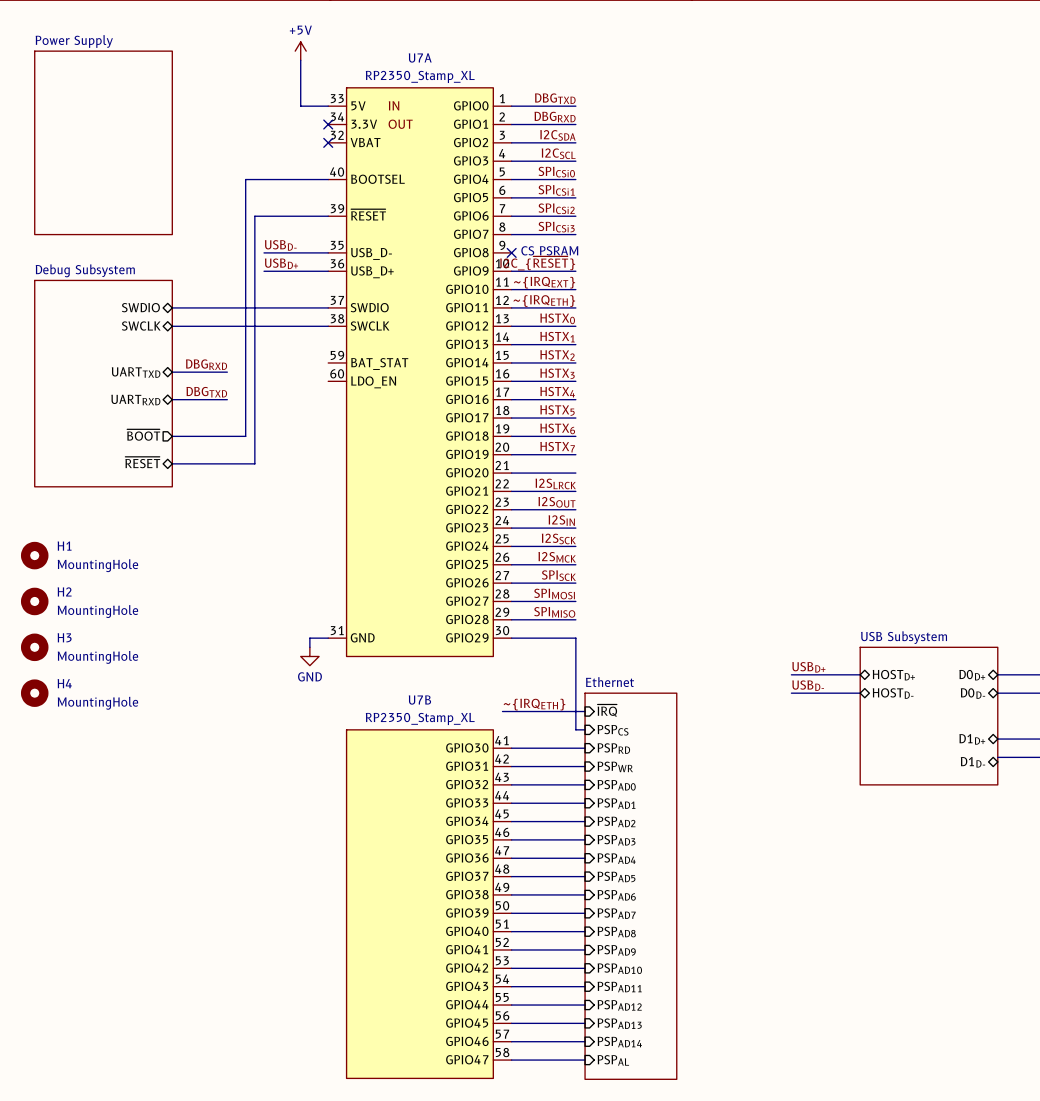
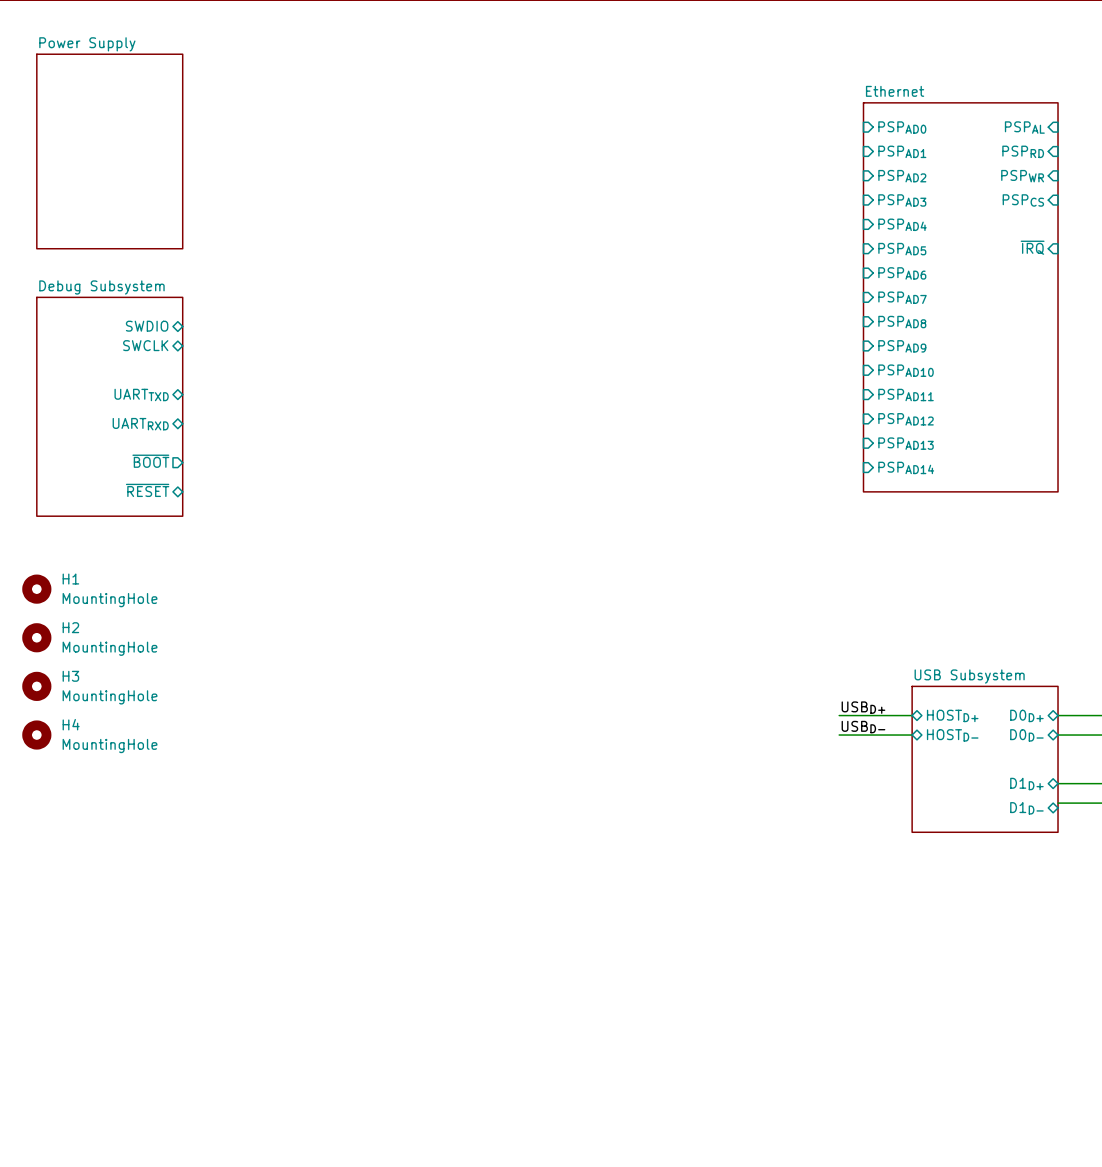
power symbol: +5V (300, 51) -> none
wire: (300, 60) (300, 106) (328, 106) -> none
label: DBGTXD (555, 98) -> none
wire: (511, 106) (575, 106) -> none
label: DBGRXD (555, 117) -> none
sheet pin: none -> PSPAD0 (902, 127)
sheet pin: none -> PSPAL (1024, 127)
no-connect mark: (328, 124) -> none
wire: (511, 124) (575, 124) -> none
label: I2CSDA (557, 135) -> none
no-connect mark: (328, 142) -> none
wire: (511, 142) (575, 142) -> none
sheet pin: none -> PSPAD1 (902, 151)
sheet pin: none -> PSPRD (1023, 151)
label: I2CSCL (558, 153) -> none
wire: (511, 161) (575, 161) -> none
sheet pin: none -> PSPAD2 (902, 176)
sheet pin: none -> PSPWR (1022, 176)
label: SPICSi0 (556, 172) -> none
wire: (328, 179) (245, 179) (245, 436) (172, 436) -> none
wire: (511, 179) (575, 179) -> none
sheet pin: none -> PSPAD3 (902, 200)
sheet pin: none -> PSPCS (1023, 200)
label: SPICSi1 (556, 190) -> none
wire: (511, 197) (575, 197) -> none
label: SPICSi2 (556, 208) -> none
sheet pin: none -> PSPAD4 (902, 224)
wire: (328, 216) (254, 216) (254, 463) (172, 463) -> none
wire: (511, 216) (575, 216) -> none
label: SPICSi3 (556, 227) -> none
sheet pin: none -> ~{IRQ} (1032, 247)
wire: (511, 234) (575, 234) -> none
sheet pin: none -> PSPAD5 (902, 249)
label: USBD- (280, 245) -> none
text: CS PSRAM (549, 250) -> none
wire: (264, 252) (328, 252) -> none
no-connect mark: (511, 252) -> none
sheet pin: none -> PSPAD6 (902, 273)
label: USBD+ (281, 263) -> none
label: I2C_{~{RESET}} (537, 263) -> none
wire: (264, 271) (328, 271) -> none
wire: (511, 271) (575, 271) -> none
sheet pin: none -> PSPAD7 (902, 297)
sheet Ethernet: none -> (960, 297)
label: ~{IRQEXT} (544, 282) -> none
wire: (511, 289) (575, 289) -> none
label: ~{IRQETH} (544, 301) -> none
sheet pin: none -> PSPAD8 (902, 322)
wire: (172, 307) (328, 307) -> none
wire: (511, 307) (575, 307) -> none
label: HSTX0 (557, 318) -> none
wire: (172, 326) (328, 326) -> none
wire: (511, 326) (575, 326) -> none
sheet pin: none -> PSPAD9 (902, 346)
label: HSTX1 (557, 337) -> none
wire: (511, 344) (575, 344) -> none
sheet pin: none -> PSPAD10 (906, 370)
label: HSTX2 (557, 355) -> none
wire: (511, 362) (575, 362) -> none
label: DBGRXD (206, 364) -> none
wire: (172, 372) (227, 372) -> none
U7A: RP2350_Stamp_XL (419, 372) -> none
sheet pin: none -> PSPAD11 (906, 394)
label: HSTX3 (557, 373) -> none
wire: (511, 381) (575, 381) -> none
label: DBGTXD (206, 392) -> none
label: HSTX4 (557, 392) -> none
sheet pin: none -> PSPAD12 (906, 419)
wire: (172, 399) (227, 399) -> none
wire: (511, 399) (575, 399) -> none
label: HSTX5 (557, 410) -> none
wire: (511, 418) (575, 418) -> none
sheet pin: none -> PSPAD13 (906, 443)
label: HSTX6 (557, 428) -> none
wire: (511, 436) (575, 436) -> none
sheet pin: none -> PSPAD14 (906, 467)
label: HSTX7 (557, 447) -> none
wire: (511, 454) (575, 454) -> none
wire: (511, 473) (575, 473) -> none
label: I2SLRCK (555, 483) -> none
wire: (511, 491) (575, 491) -> none
label: I2SOUT (556, 502) -> none
wire: (511, 509) (575, 509) -> none
label: I2SIN (561, 520) -> none
wire: (511, 528) (575, 528) -> none
label: I2SSCK (558, 538) -> none
wire: (511, 546) (575, 546) -> none
label: I2SMCK (557, 557) -> none
wire: (511, 564) (575, 564) -> none
label: SPISCK (558, 575) -> none
wire: (511, 583) (575, 583) -> none
label: SPIMOSI (554, 594) -> none
wire: (511, 601) (575, 601) -> none
label: SPIMISO (554, 612) -> none
wire: (511, 619) (575, 619) -> none
wire: (328, 638) (309, 638) (309, 647) -> none
wire: (511, 638) (575, 638) (575, 729) (585, 729) -> none
power symbol: GND (309, 656) -> none
label: ~{IRQETH} (534, 704) -> none
sheet pin: ~{IRQ} (607, 710) -> none
wire: (502, 711) (585, 711) -> none
sheet pin: PSPCS (613, 730) -> none
wire: (511, 748) (585, 748) -> none
sheet pin: PSPRD (613, 748) -> none
wire: (511, 766) (585, 766) -> none
sheet pin: PSPWR (615, 766) -> none
wire: (511, 784) (585, 784) -> none
sheet pin: PSPAD0 (616, 785) -> none
wire: (511, 803) (585, 803) -> none
sheet pin: PSPAD1 (616, 803) -> none
wire: (511, 821) (585, 821) -> none
sheet pin: PSPAD2 (616, 821) -> none
wire: (511, 839) (585, 839) -> none
sheet pin: PSPAD3 (616, 840) -> none
wire: (511, 858) (585, 858) -> none
sheet pin: PSPAD4 (616, 858) -> none
wire: (511, 876) (585, 876) -> none
sheet pin: PSPAD5 (616, 876) -> none
sheet Ethernet: (630, 886) -> none
wire: (511, 894) (585, 894) -> none
sheet pin: PSPAD6 (616, 895) -> none
U7B: RP2350_Stamp_XL (428, 904) -> none
wire: (511, 913) (585, 913) -> none
sheet pin: PSPAD7 (616, 913) -> none
wire: (511, 931) (585, 931) -> none
sheet pin: PSPAD8 (616, 932) -> none
wire: (511, 949) (585, 949) -> none
sheet pin: PSPAD9 (616, 950) -> none
wire: (511, 968) (585, 968) -> none
sheet pin: PSPAD10 (619, 968) -> none
wire: (511, 986) (585, 986) -> none
sheet pin: PSPAD11 (619, 987) -> none
wire: (511, 1005) (585, 1005) -> none
sheet pin: PSPAD12 (619, 1005) -> none
wire: (511, 1023) (585, 1023) -> none
sheet pin: PSPAD13 (619, 1023) -> none
wire: (511, 1041) (585, 1041) -> none
sheet pin: PSPAD14 (619, 1042) -> none
wire: (511, 1060) (585, 1060) -> none
sheet pin: PSPAL (613, 1060) -> none

